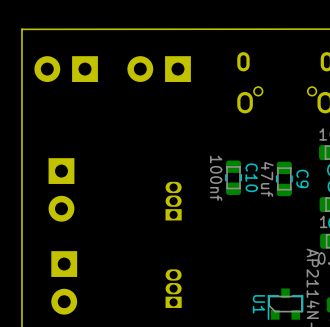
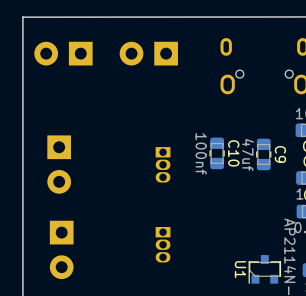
part rotation: 0° (173, 201) -> 180° (163, 164)
part rotation: 0° (173, 288) -> 180° (163, 244)

